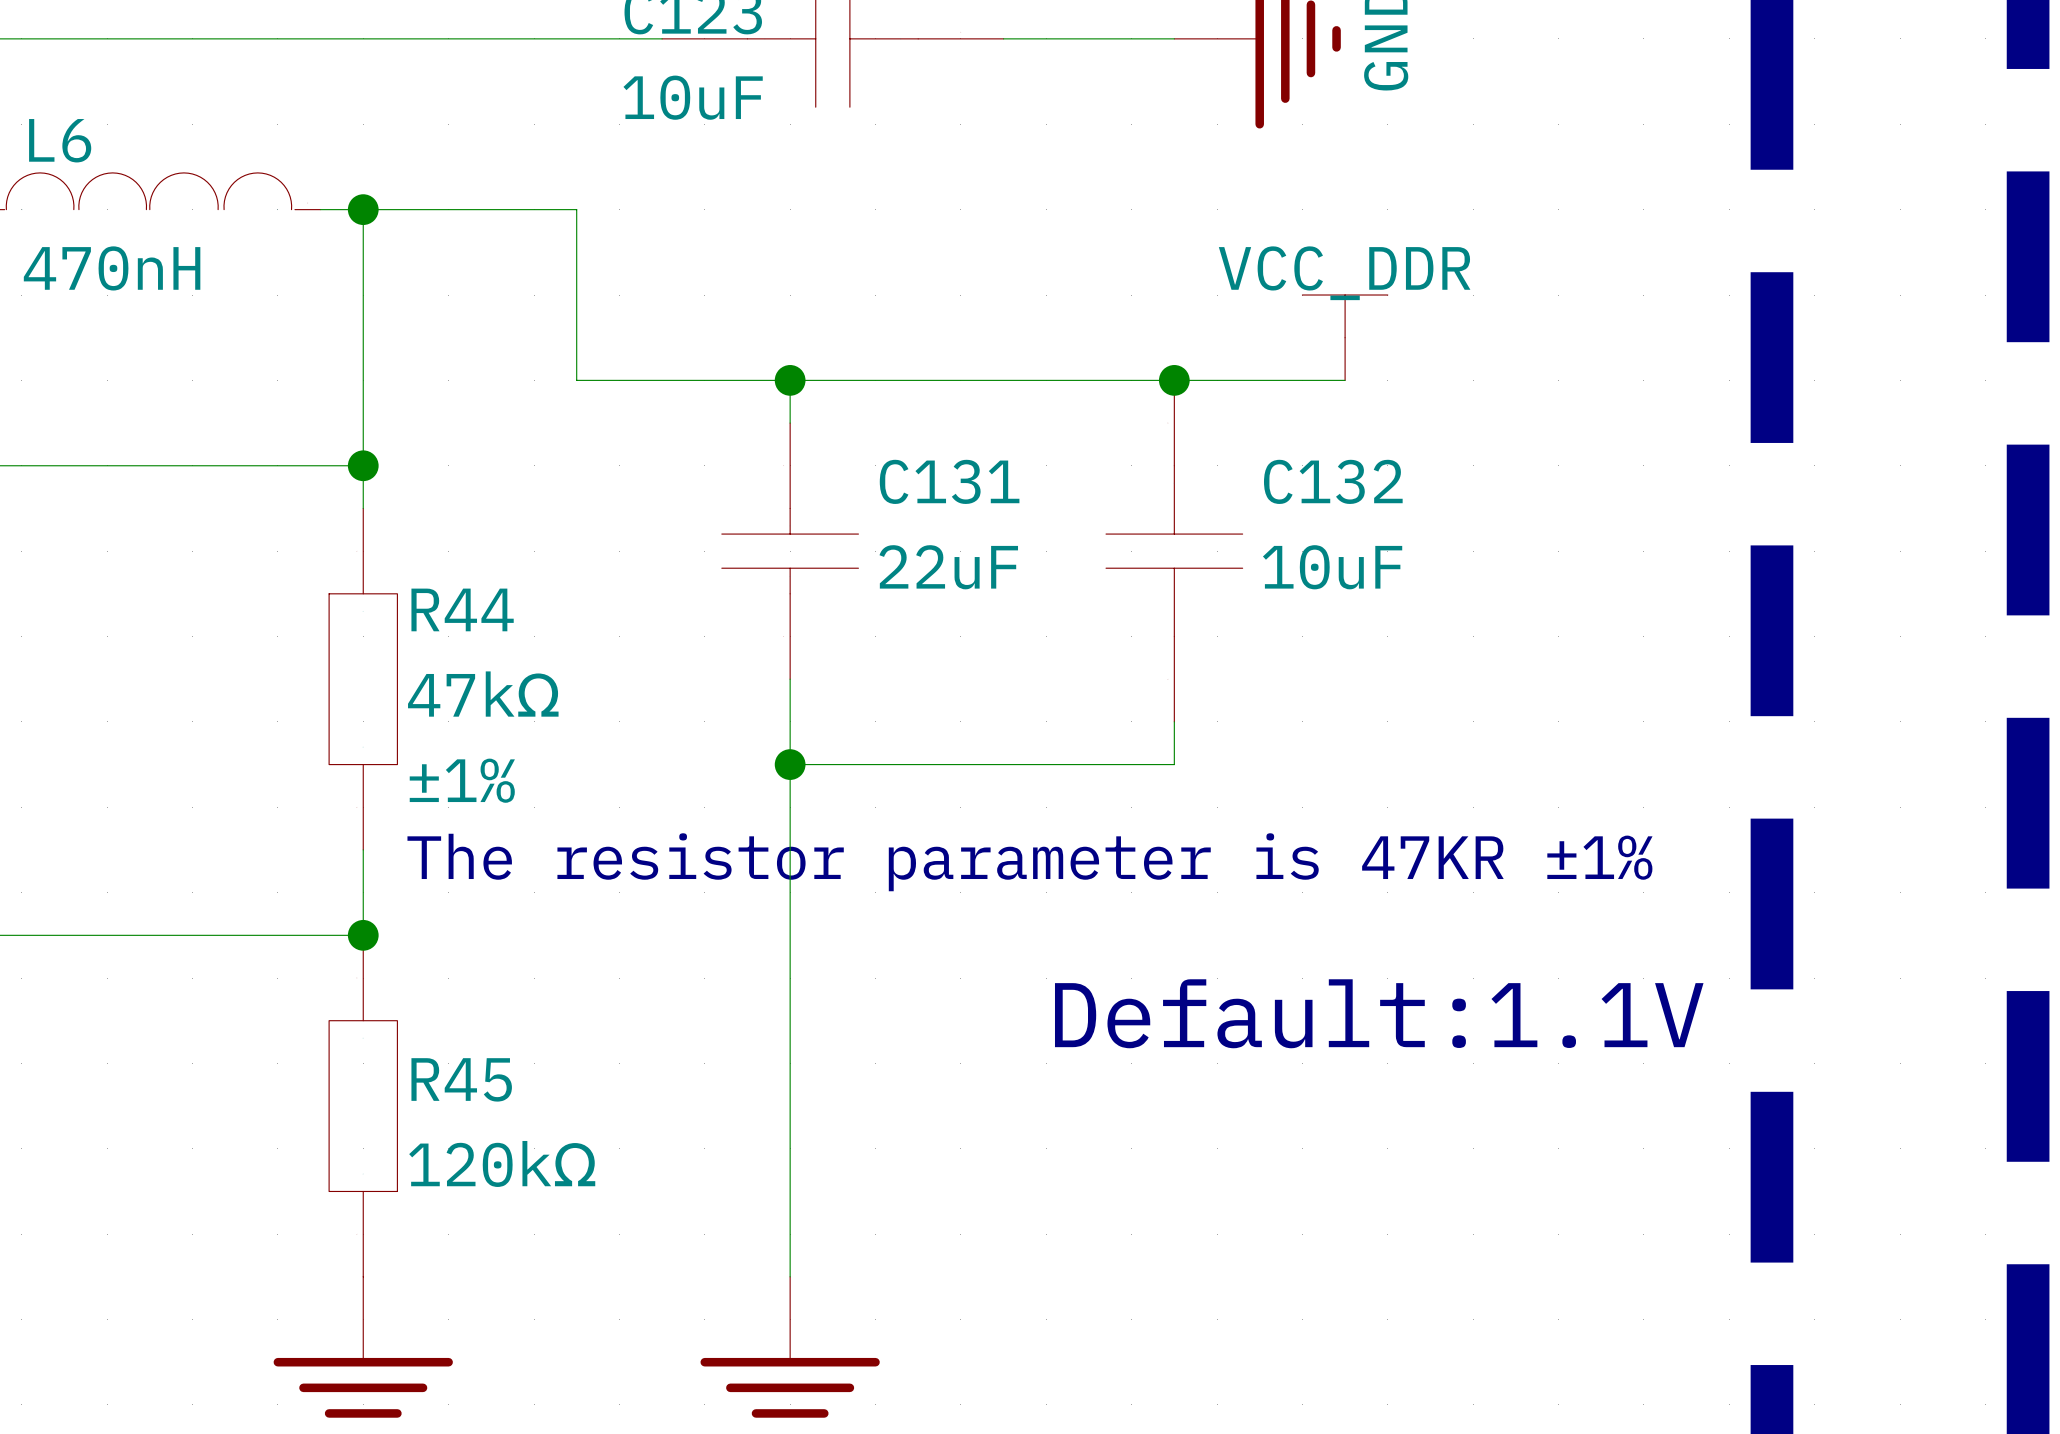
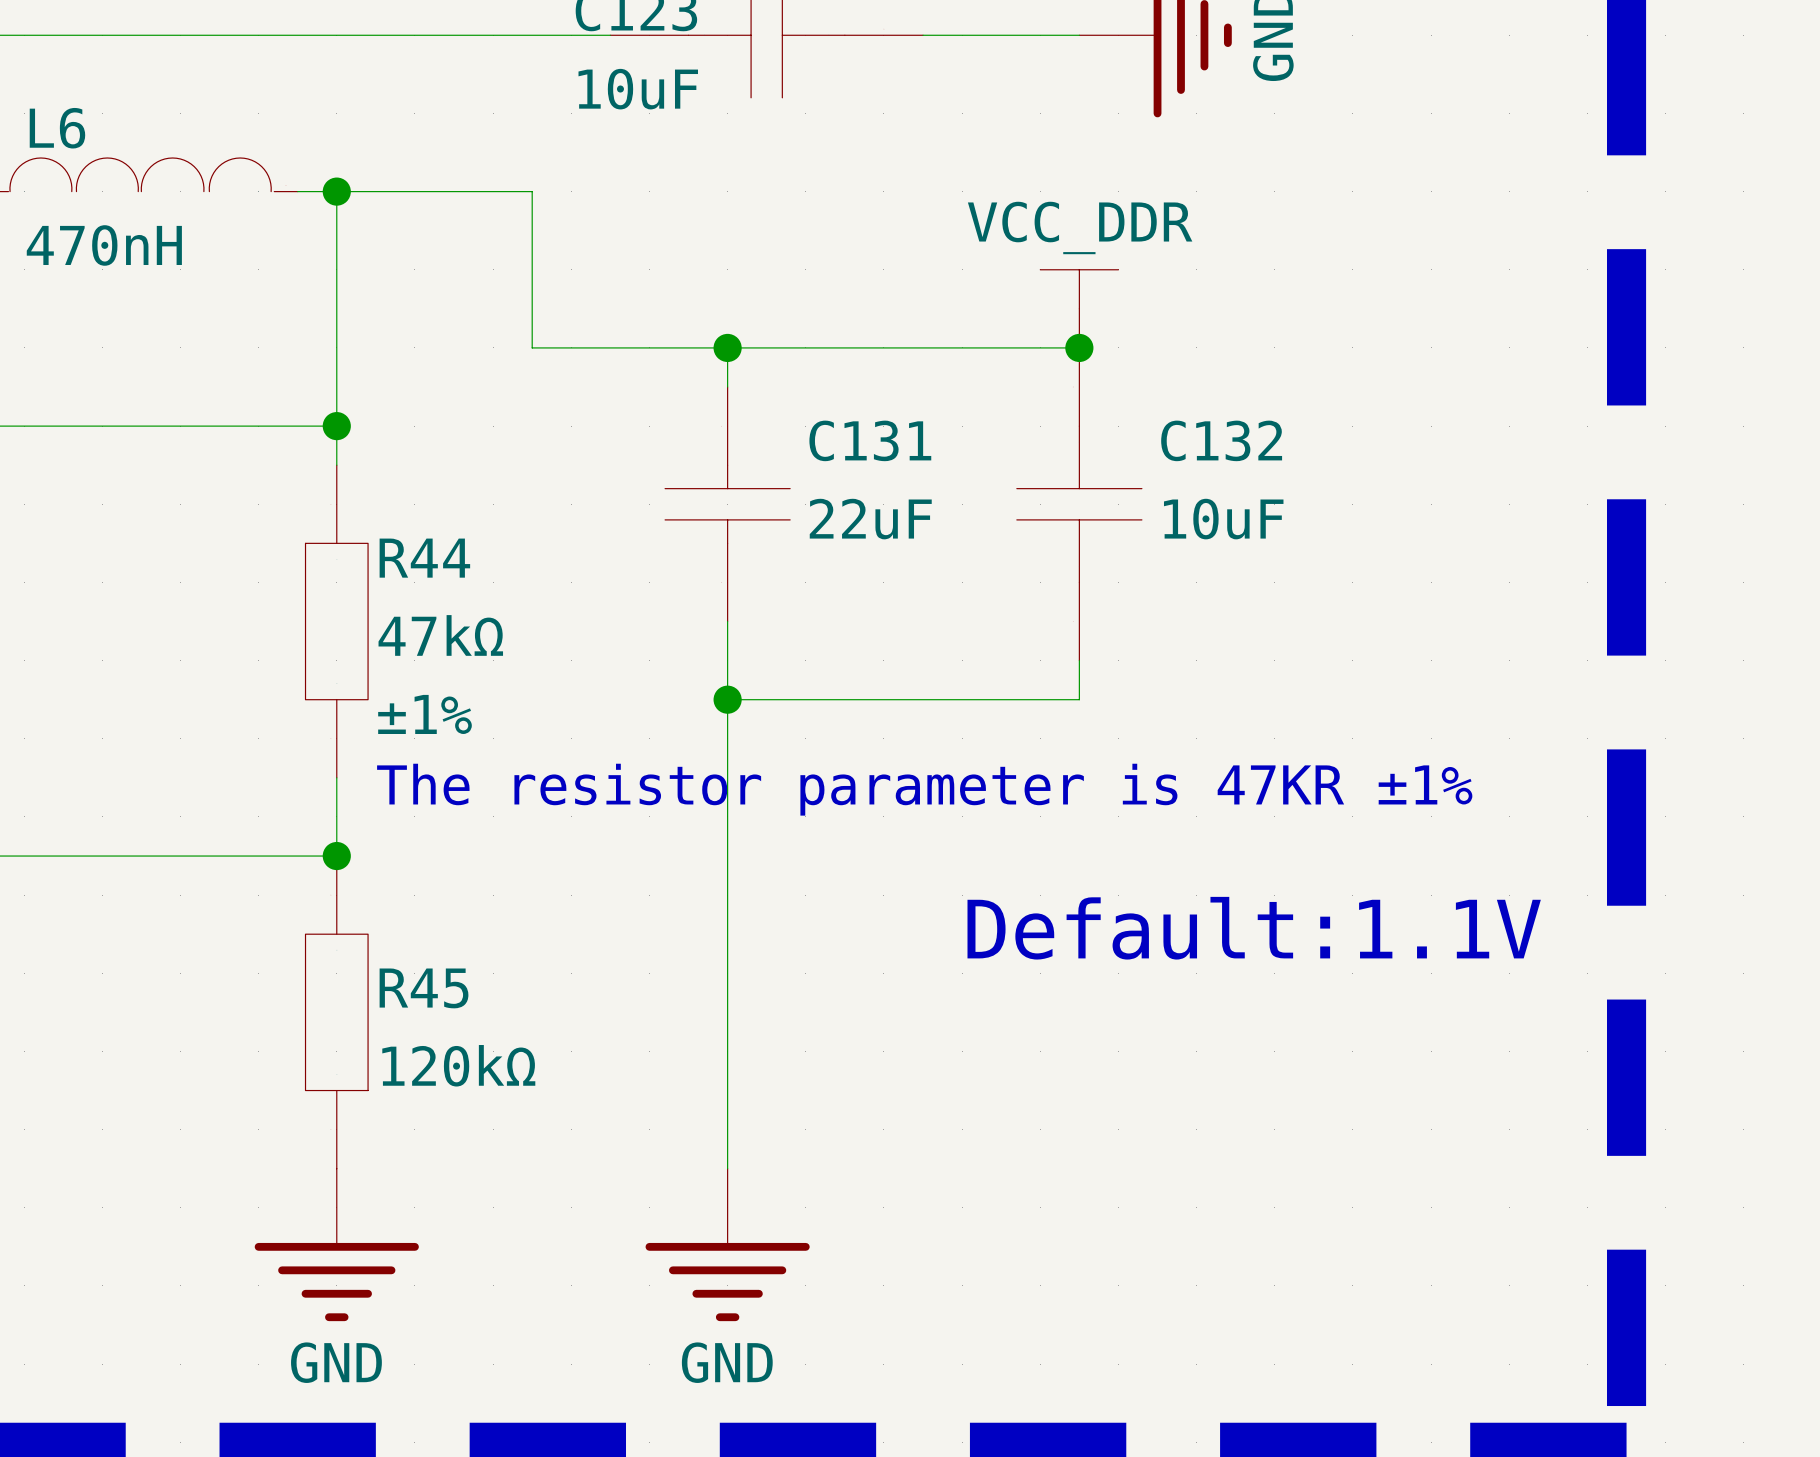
power symbol text position: VCC_DDR (1344, 273) -> VCC_DDR (1080, 227)
power symbol position: VCC_DDR (1345, 337) -> VCC_DDR (1079, 308)
wire: (1174, 380) (1345, 380) -> none

